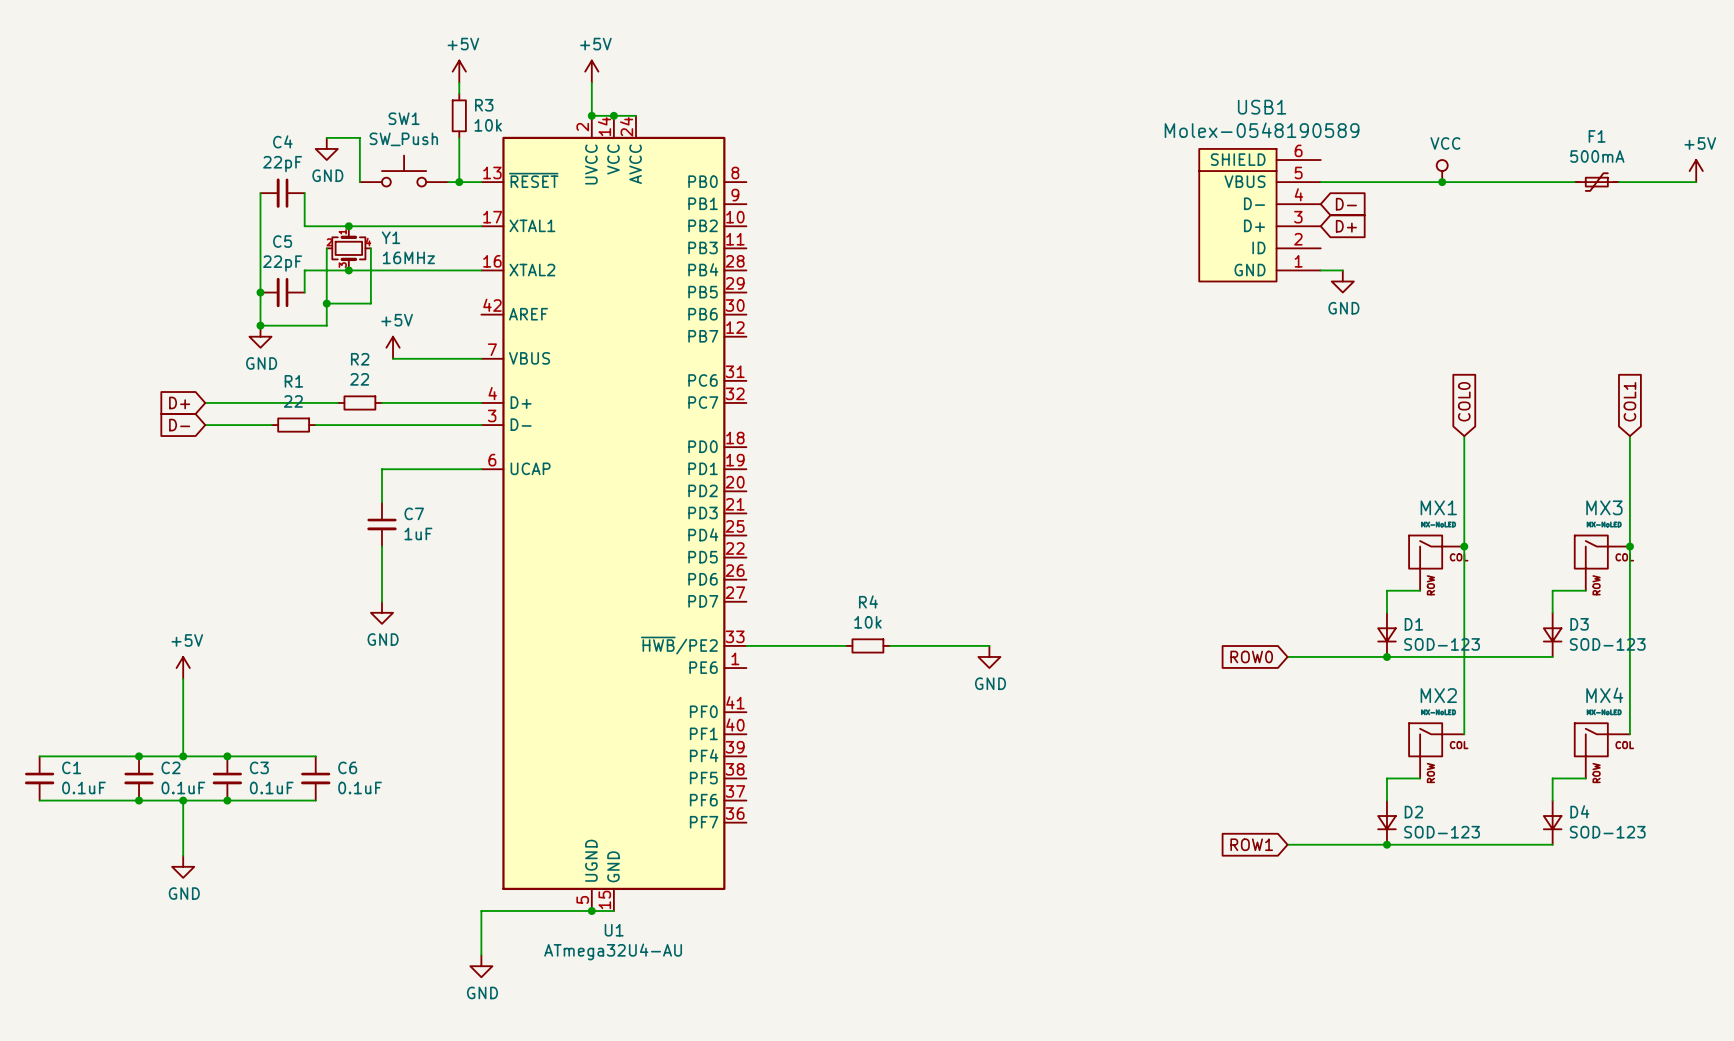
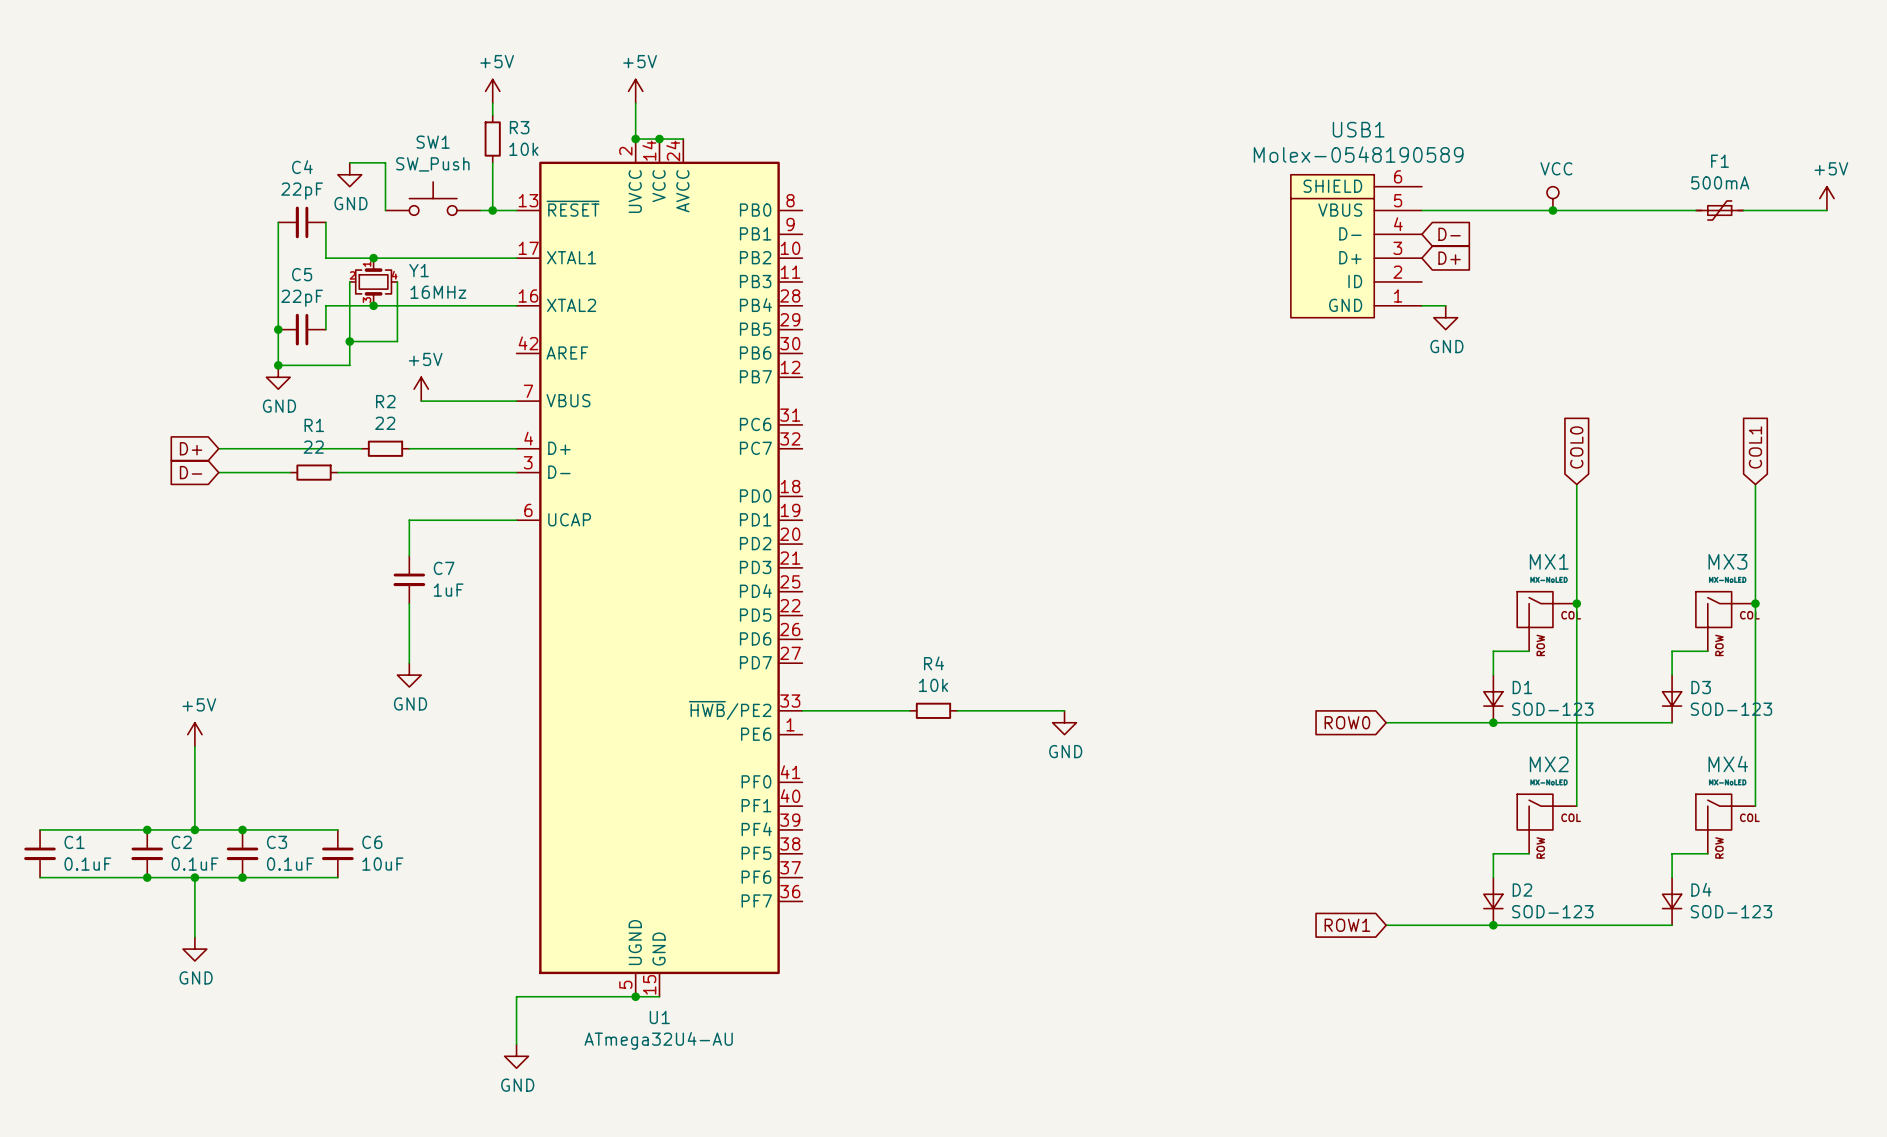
C6 value: 0.1uF (360, 787) -> 10uF (382, 864)

